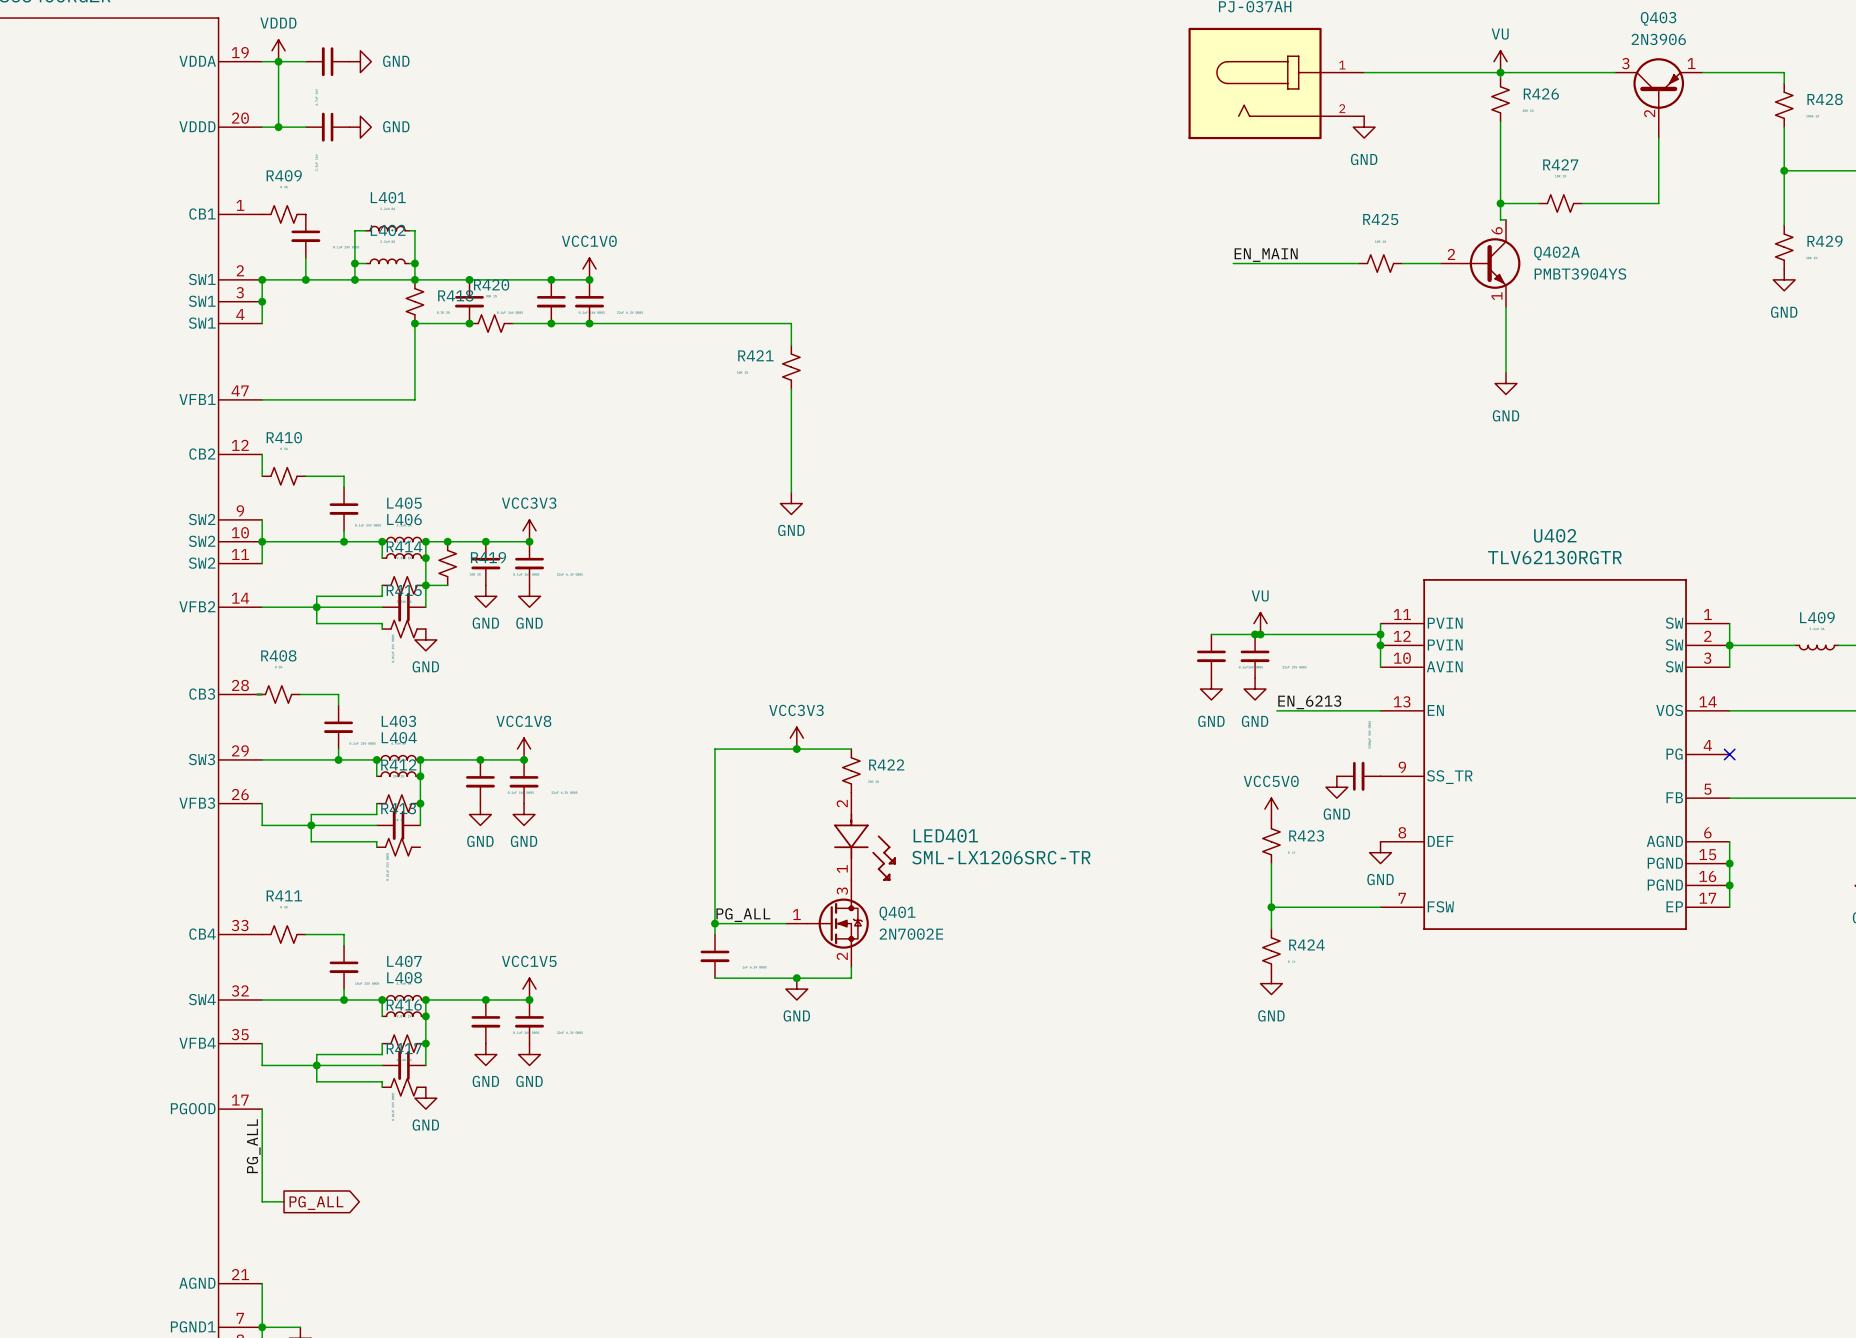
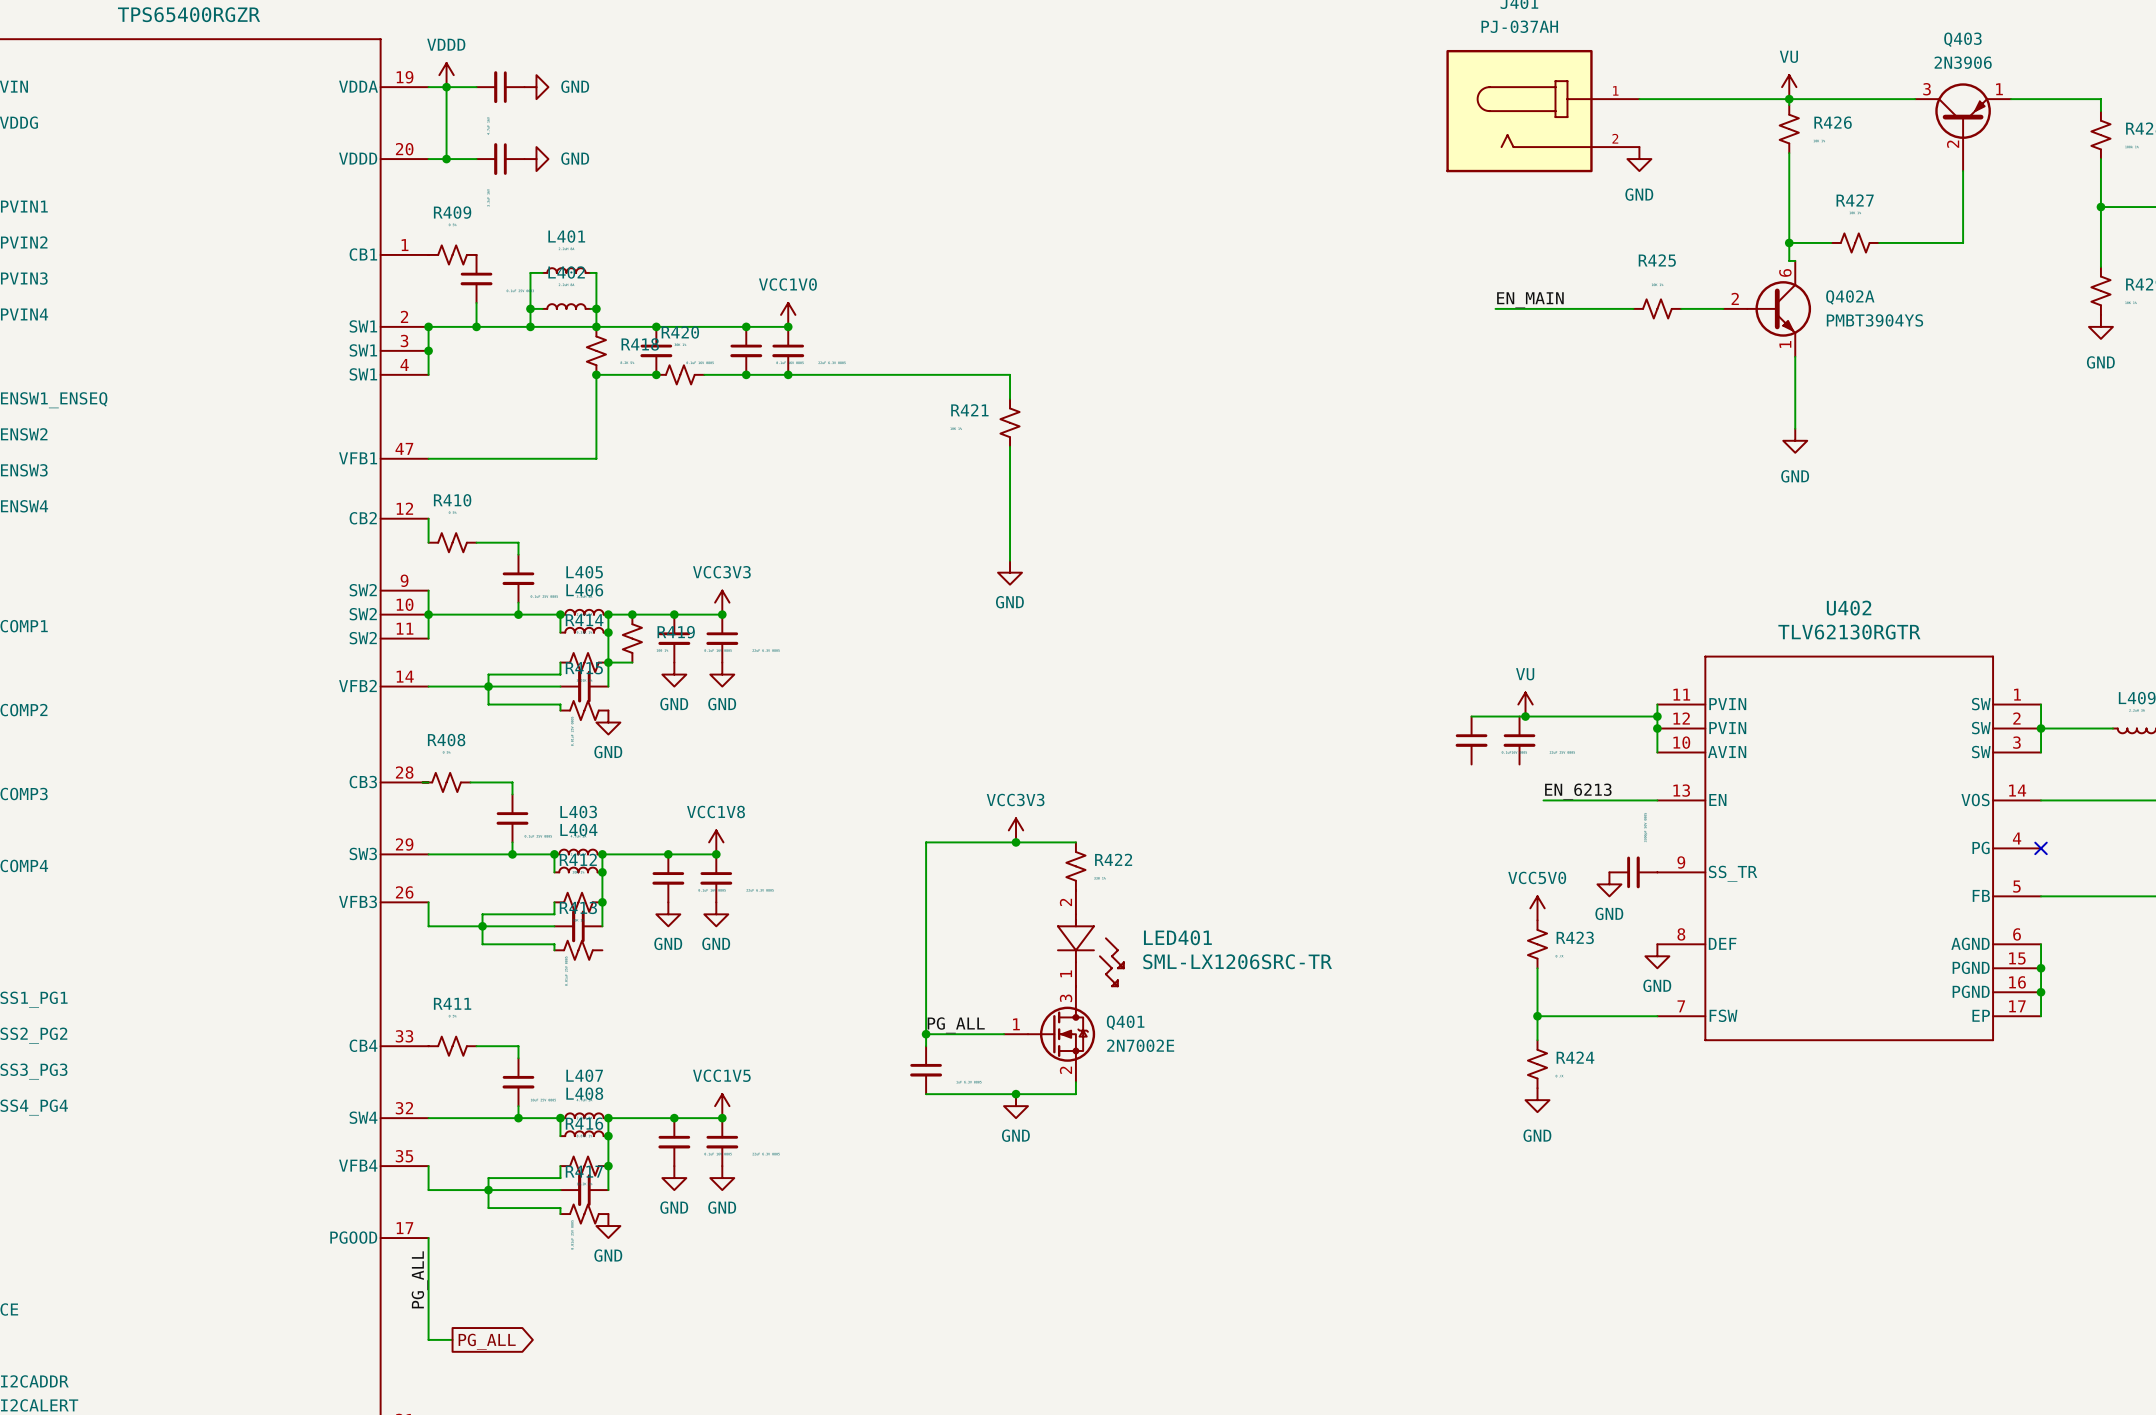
junction: (1255, 634) -> none
power symbol: GND (1211, 689) -> none
power symbol: GND (1255, 689) -> none

